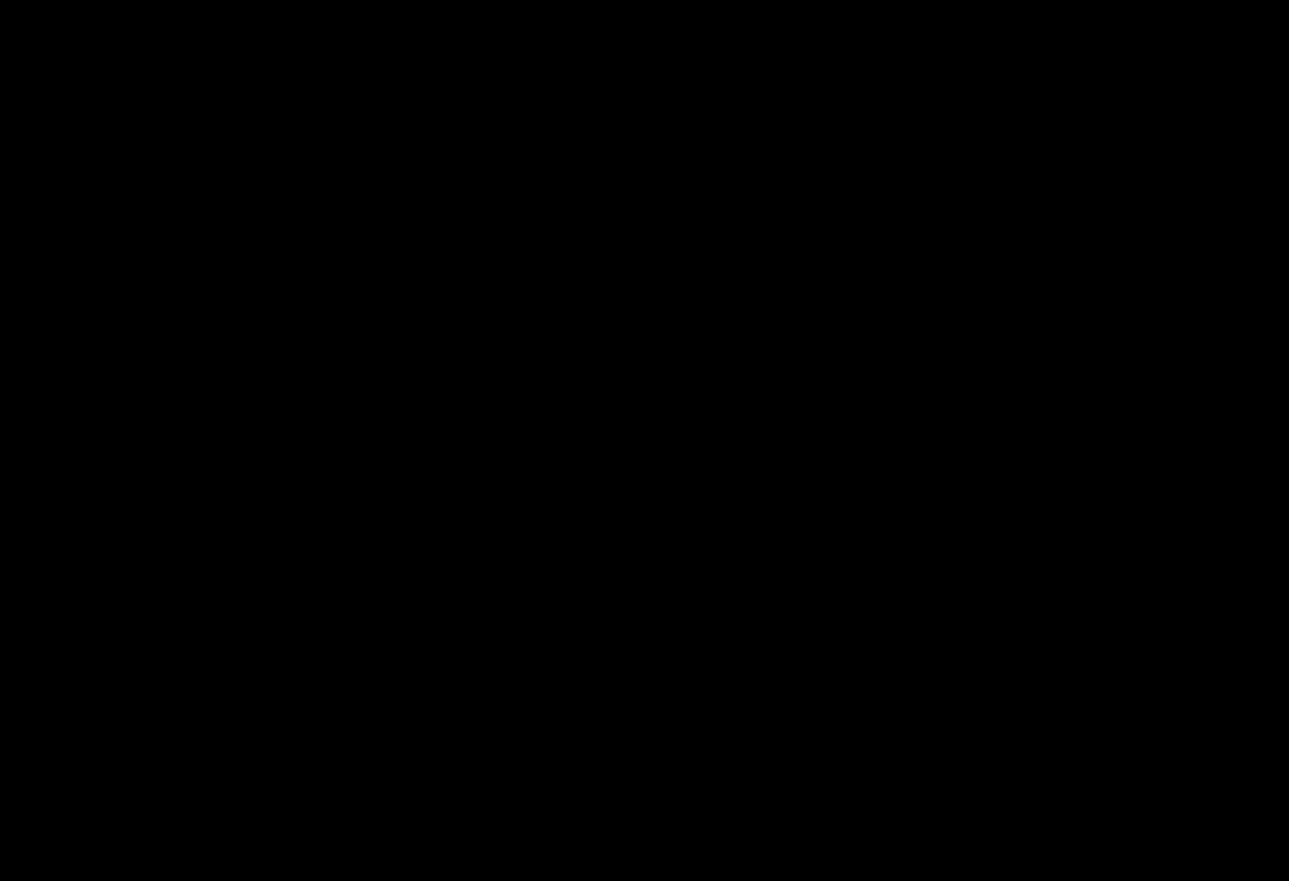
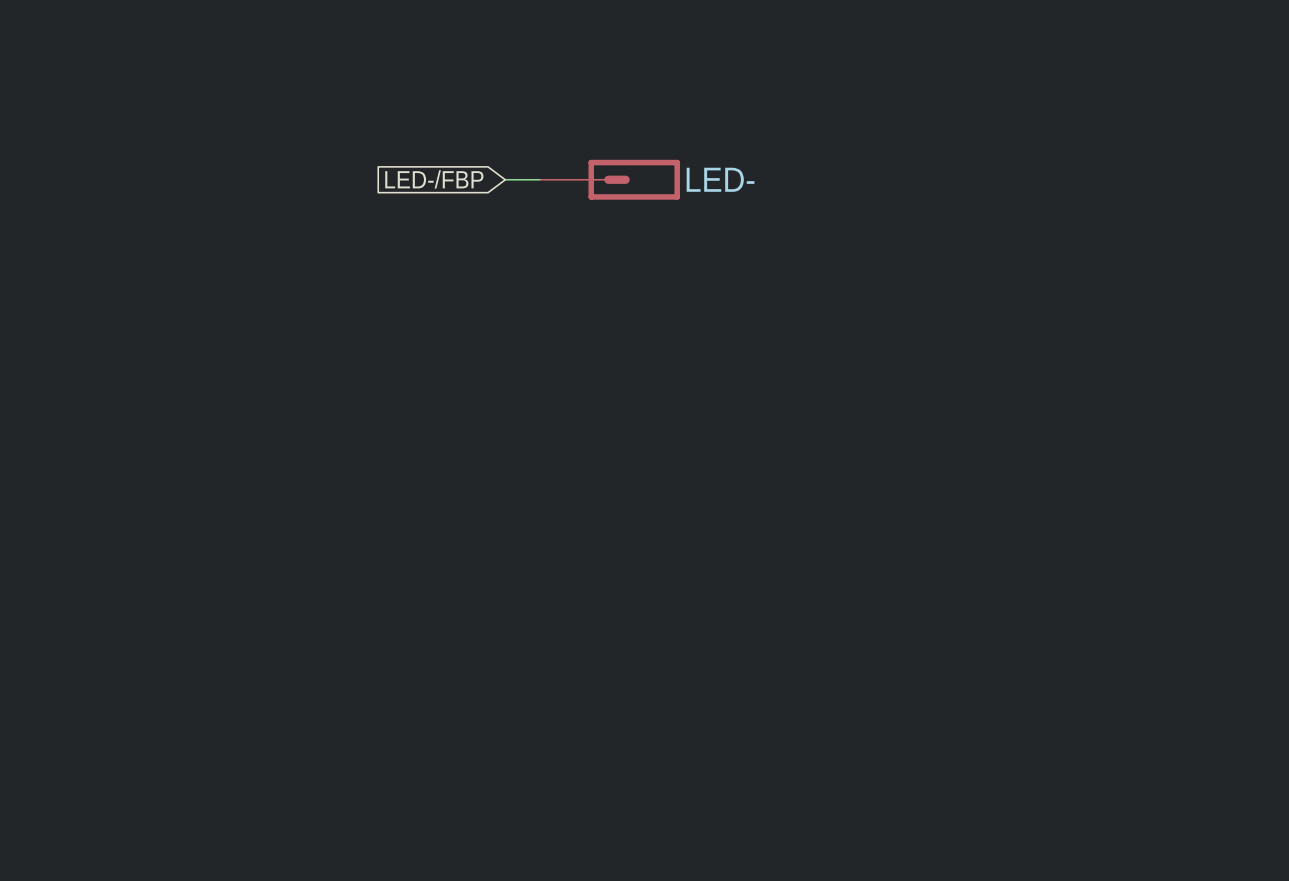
wire: none -> (505, 179) (539, 179)
LED-: none -> (609, 179)
global label: none -> LED-/FBP (434, 179)

